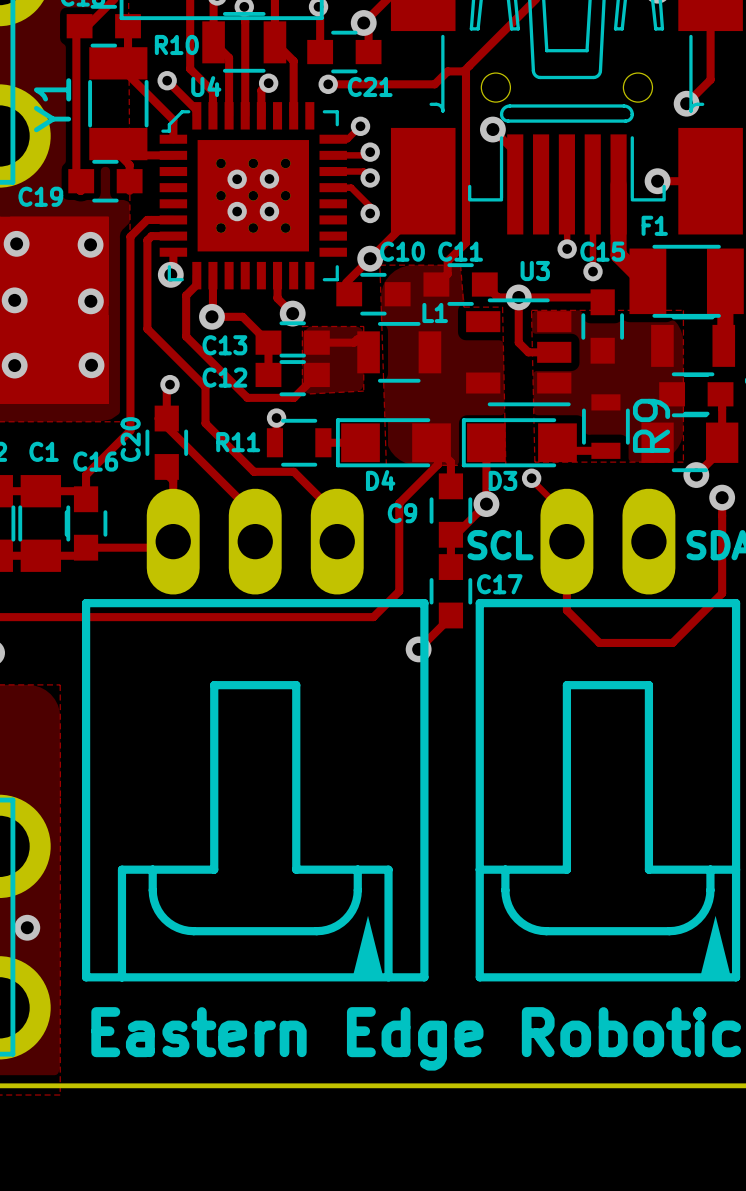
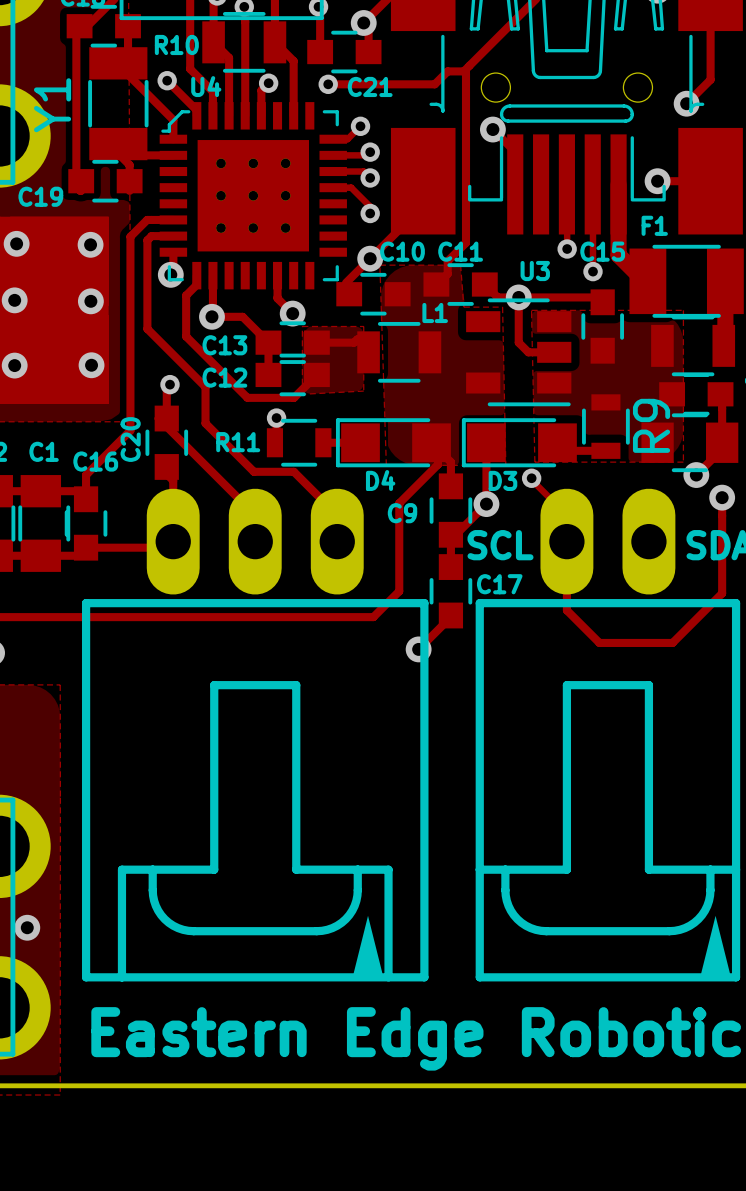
via: (269, 178) -> none
via: (237, 179) -> none
via: (237, 211) -> none
via: (269, 211) -> none

